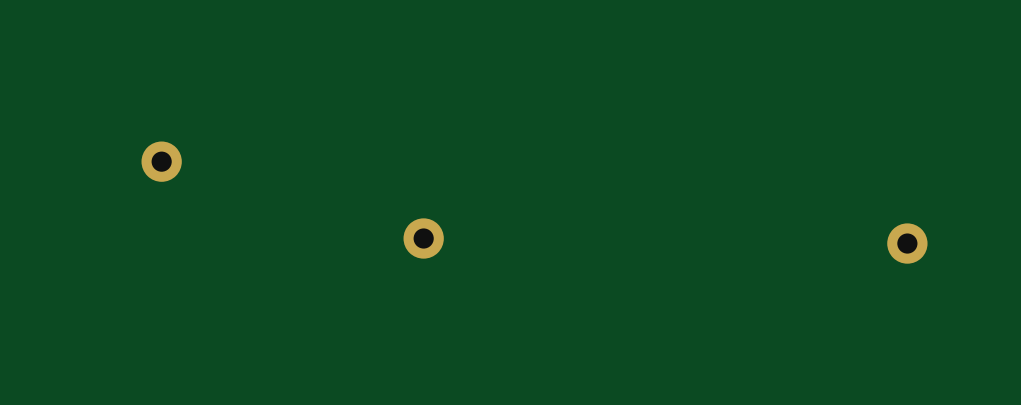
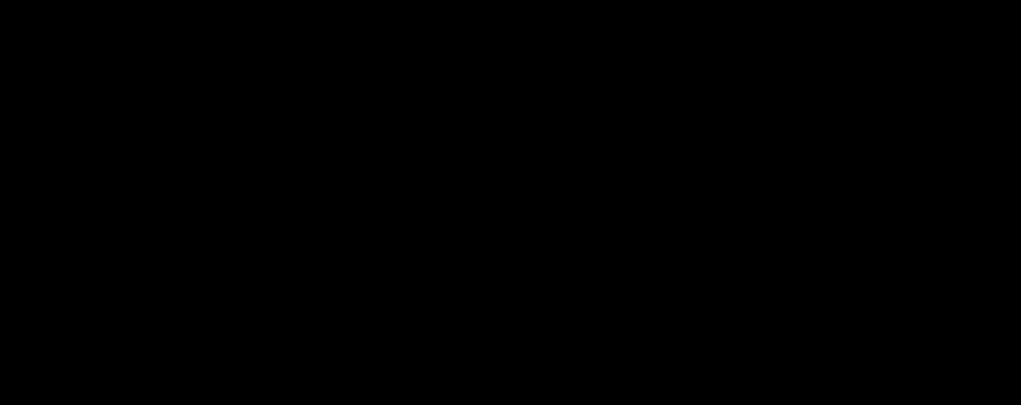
via: (161, 161) -> none
via: (423, 238) -> none
via: (907, 243) -> none

